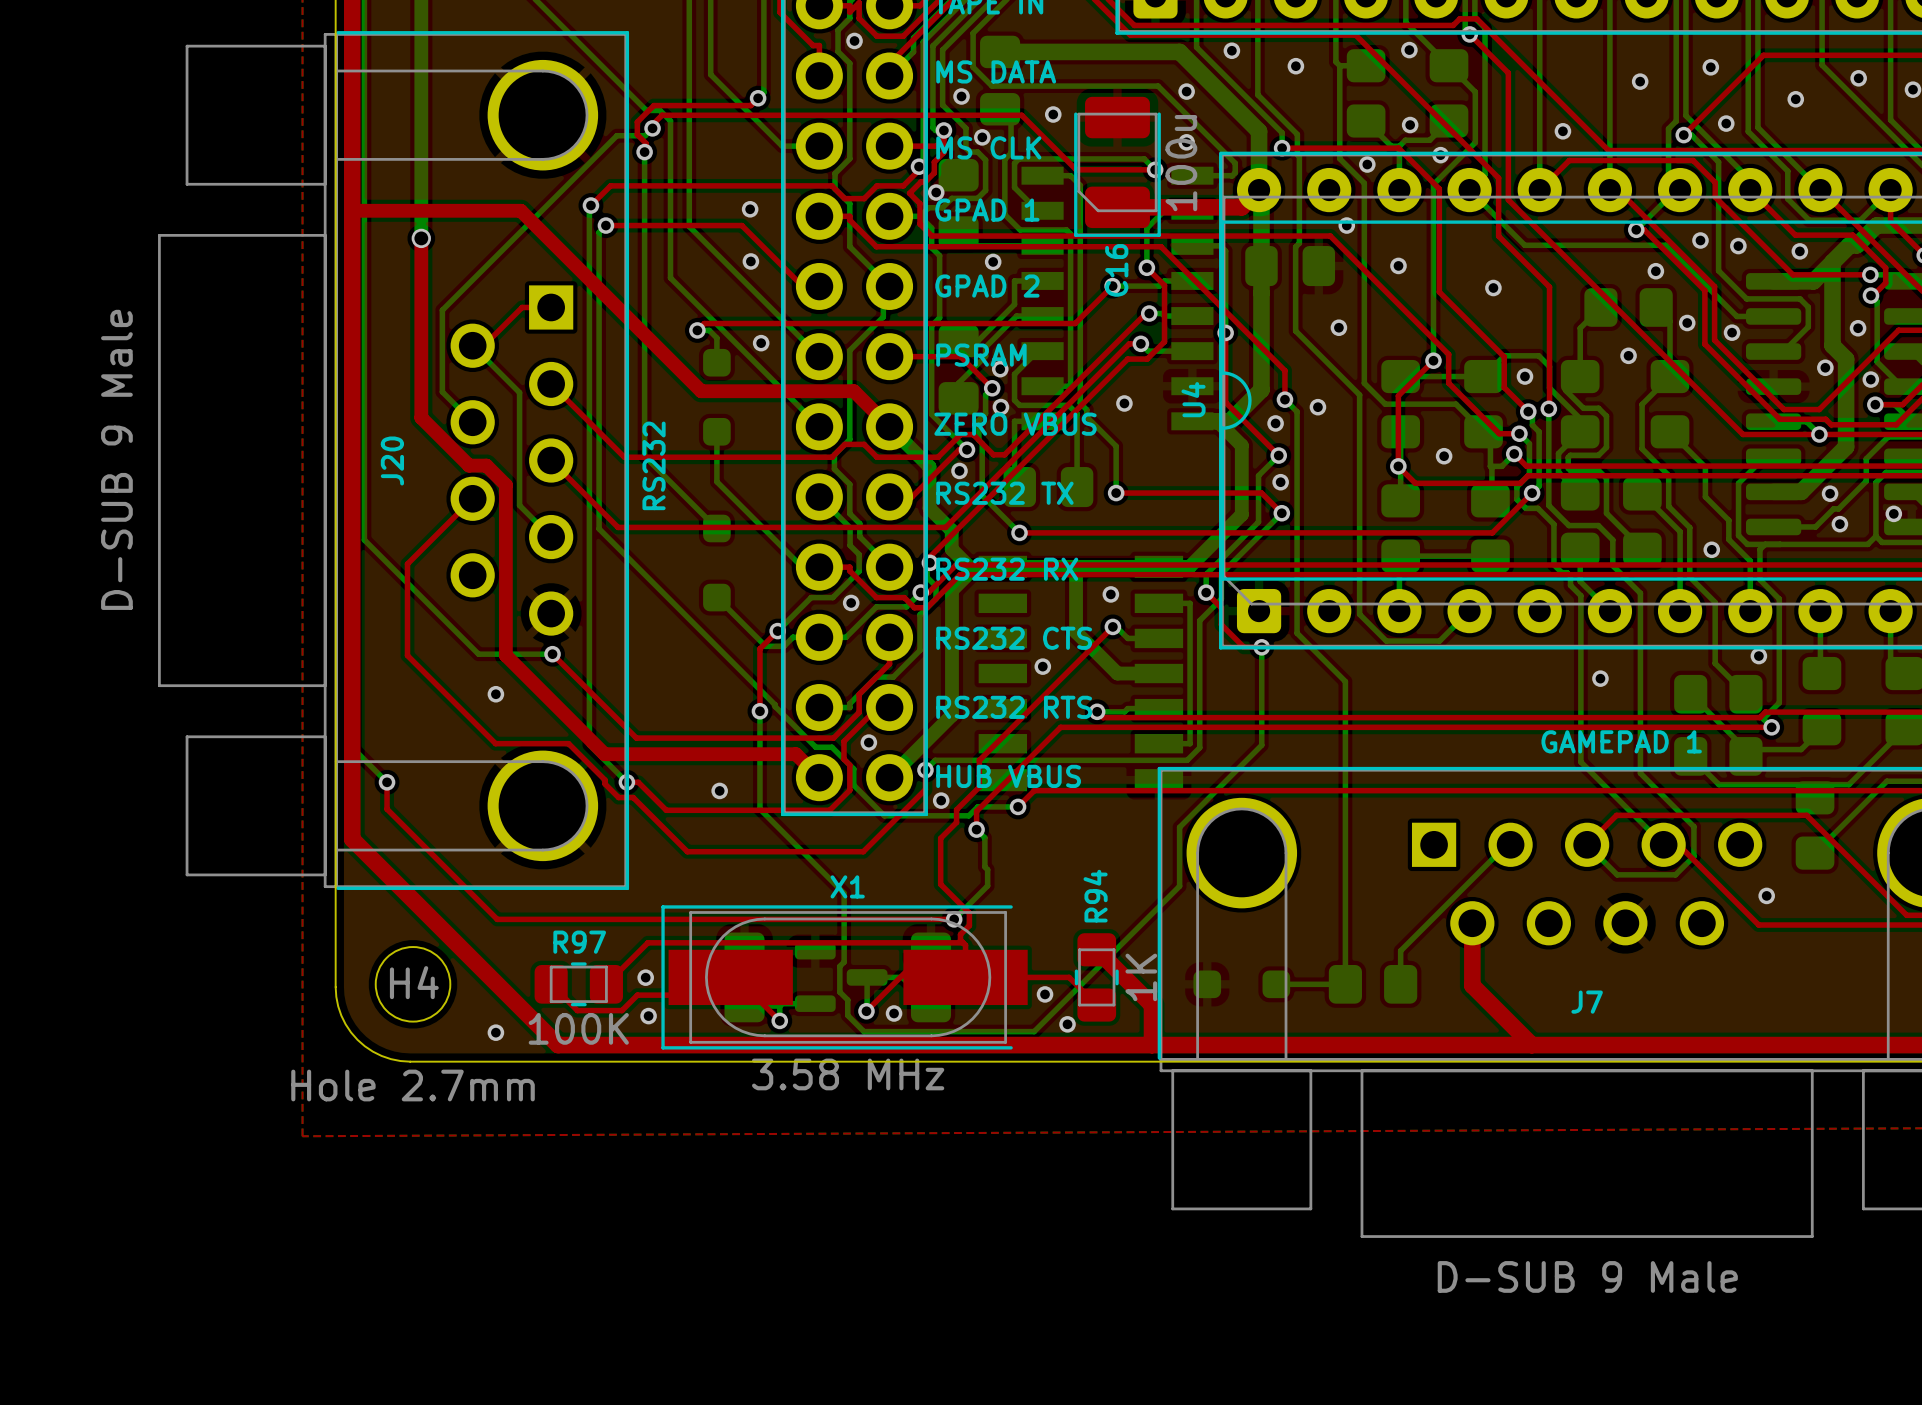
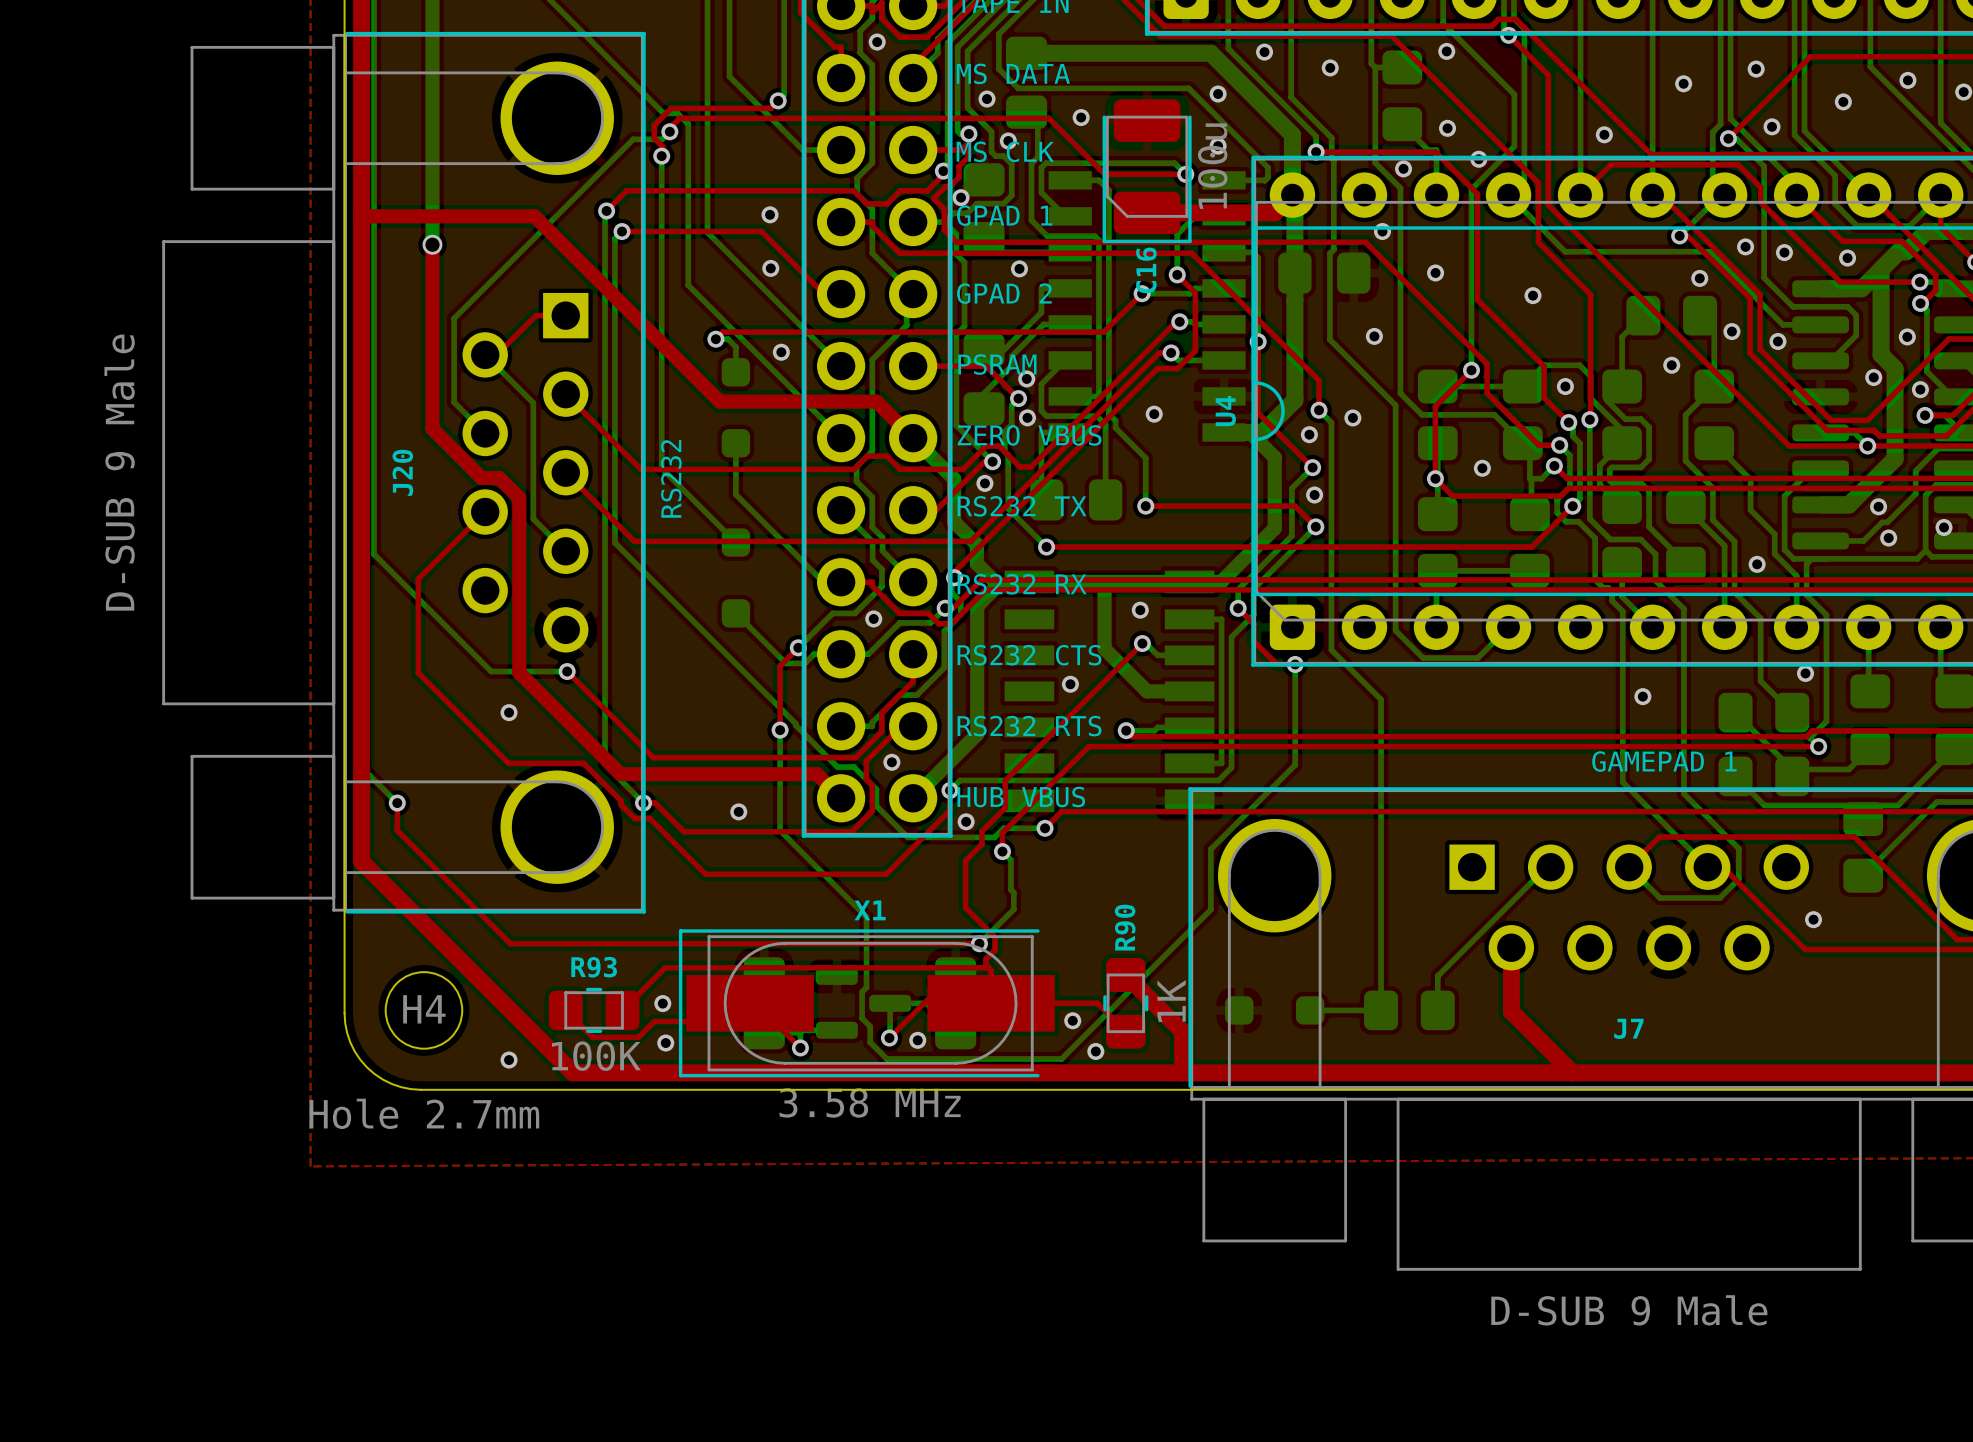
part: (1449, 93) -> none
bottom track: (1449, 121) (1429, 140) (1405, 140) (1399, 146) -> none
R94 name: R94 (1095, 896) -> R90 (1125, 927)
R97 name: R97 (579, 942) -> R93 (594, 967)

